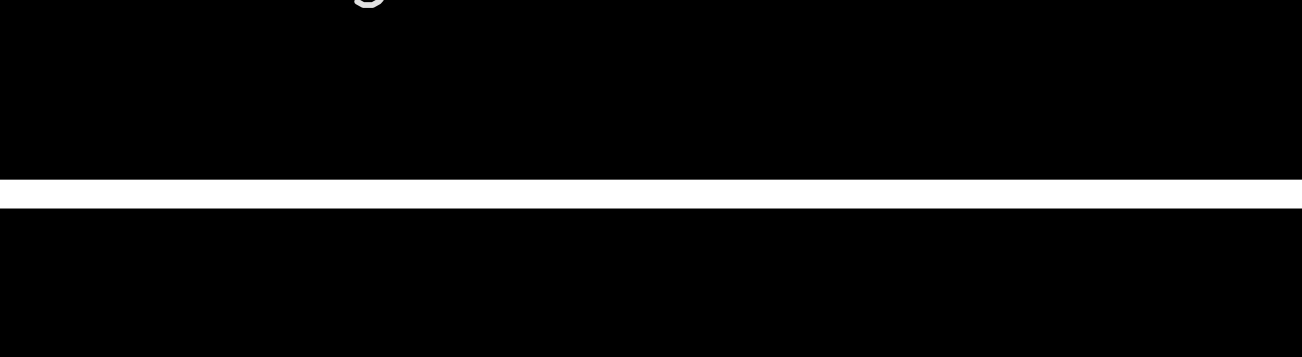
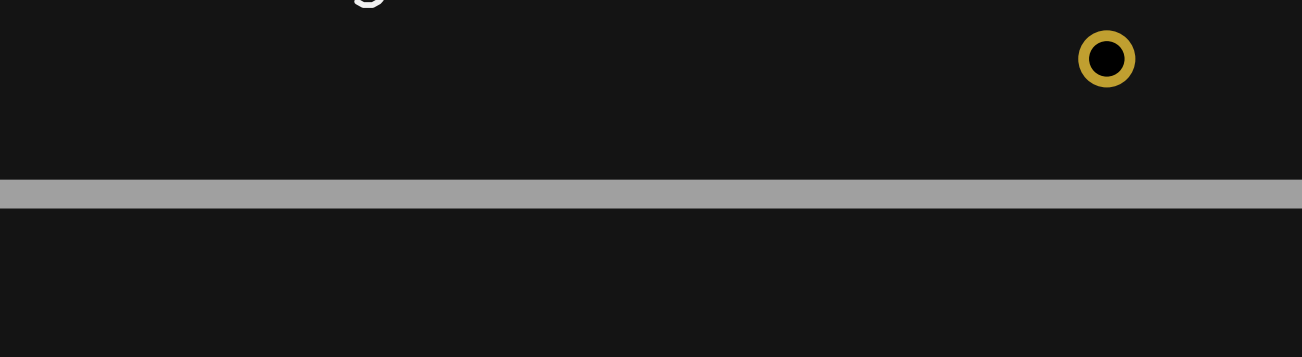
via: none -> (1106, 58)

